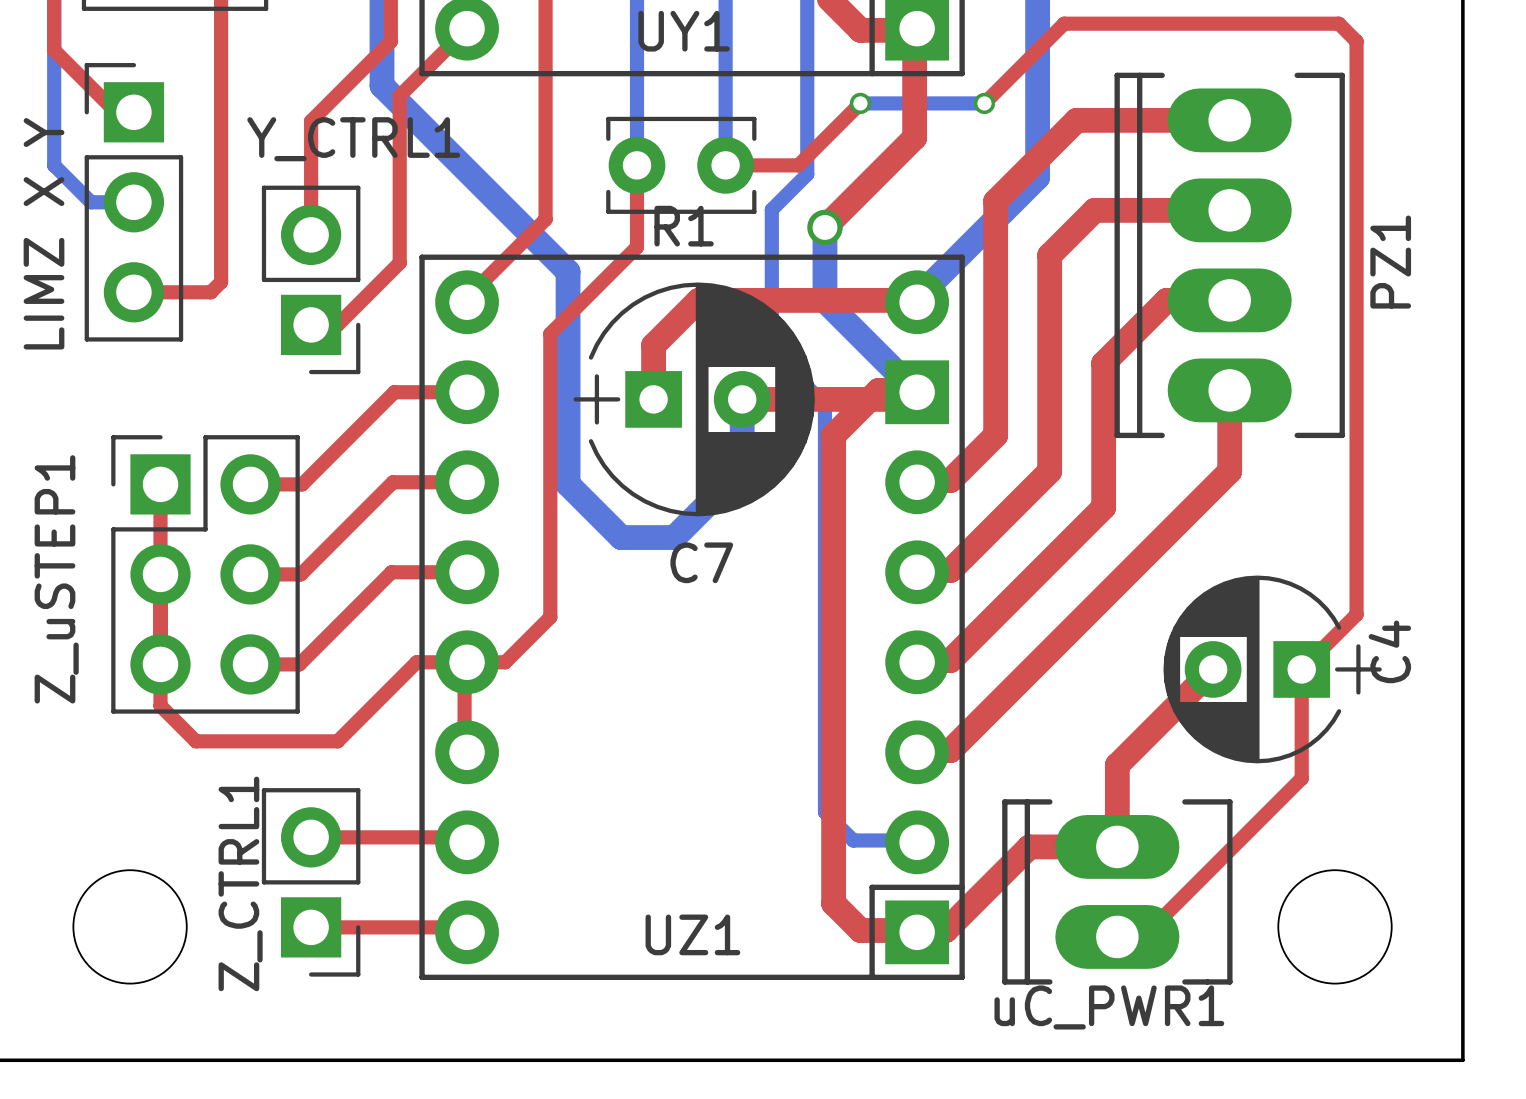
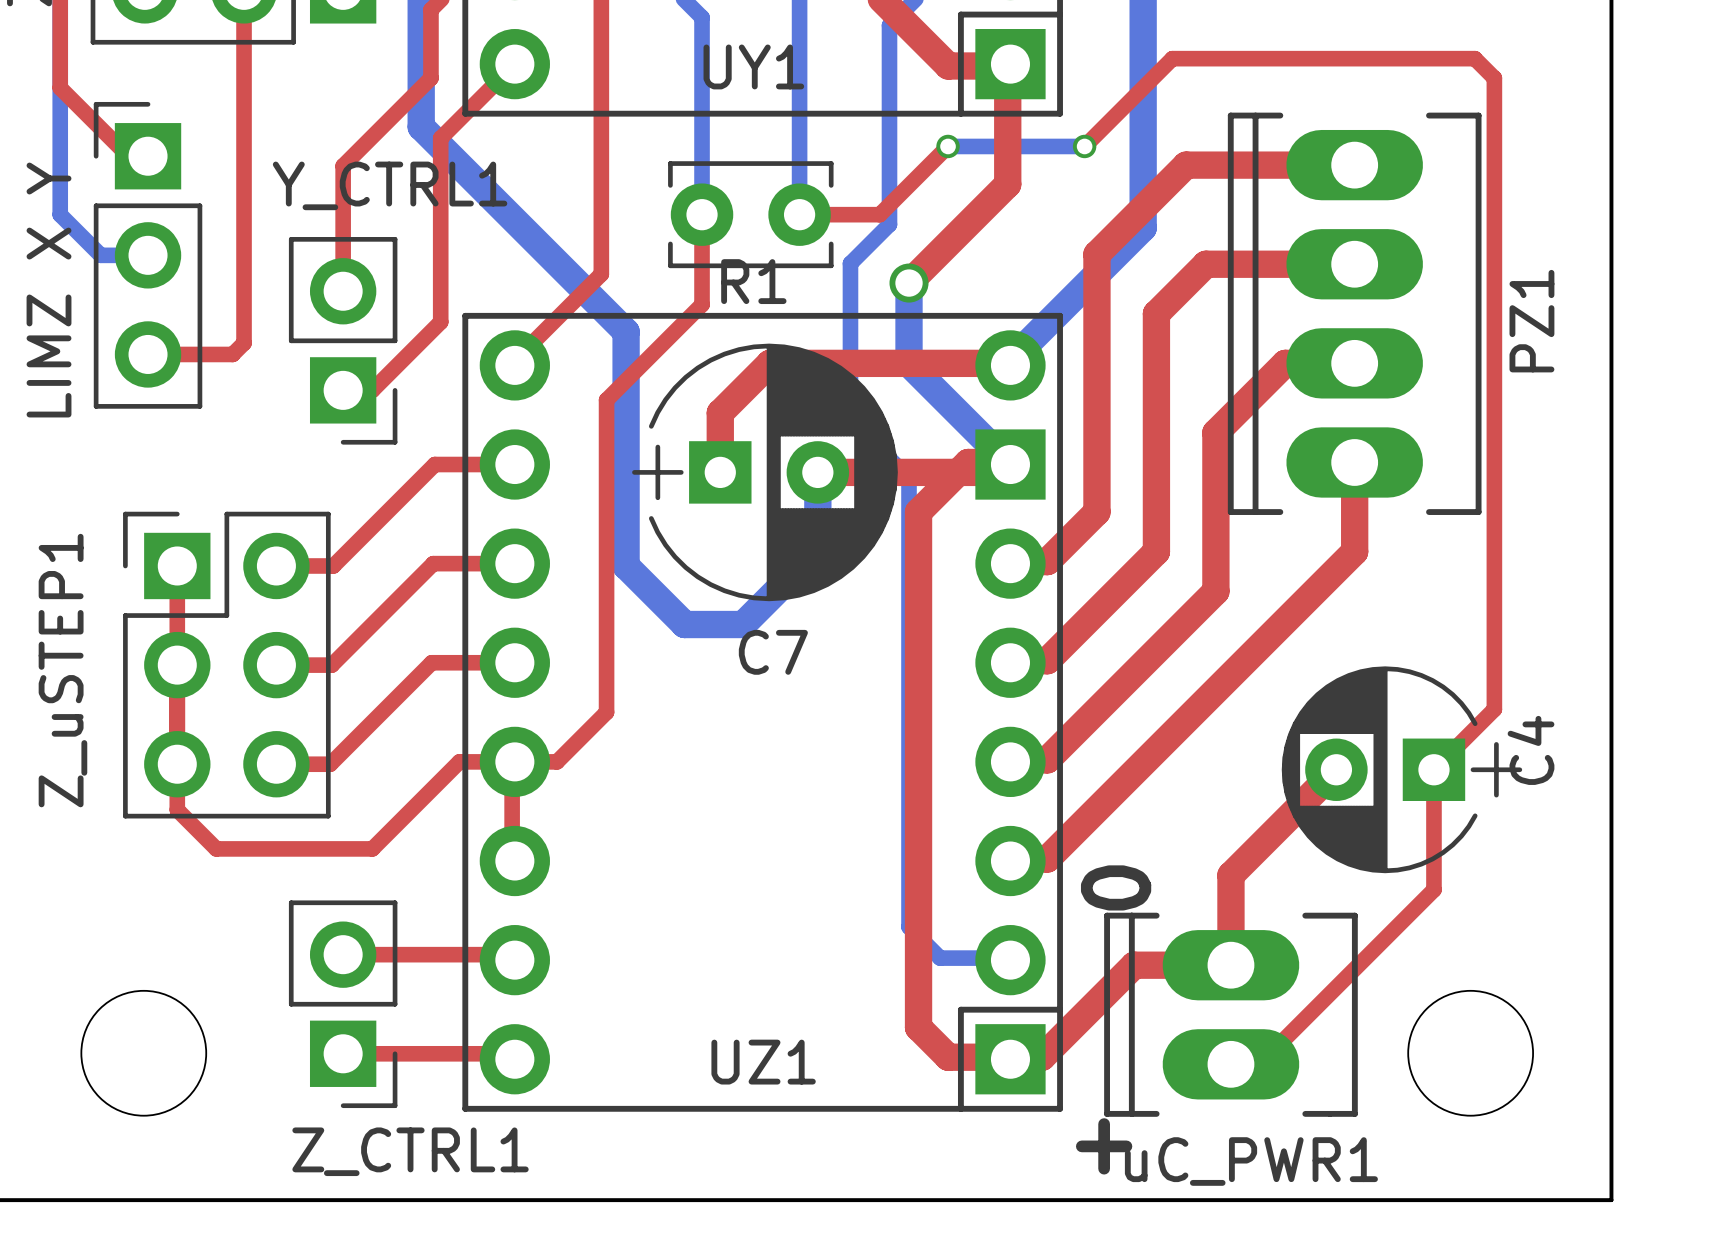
text: none -> 0 (1116, 887)
Z_CTRL1 name rotation: 0° (240, 883) -> 90° clockwise (410, 1151)
uC_PWR1 name position: uC_PWR1 (1109, 1007) -> uC_PWR1 (1251, 1161)
text: none -> + (1104, 1146)

